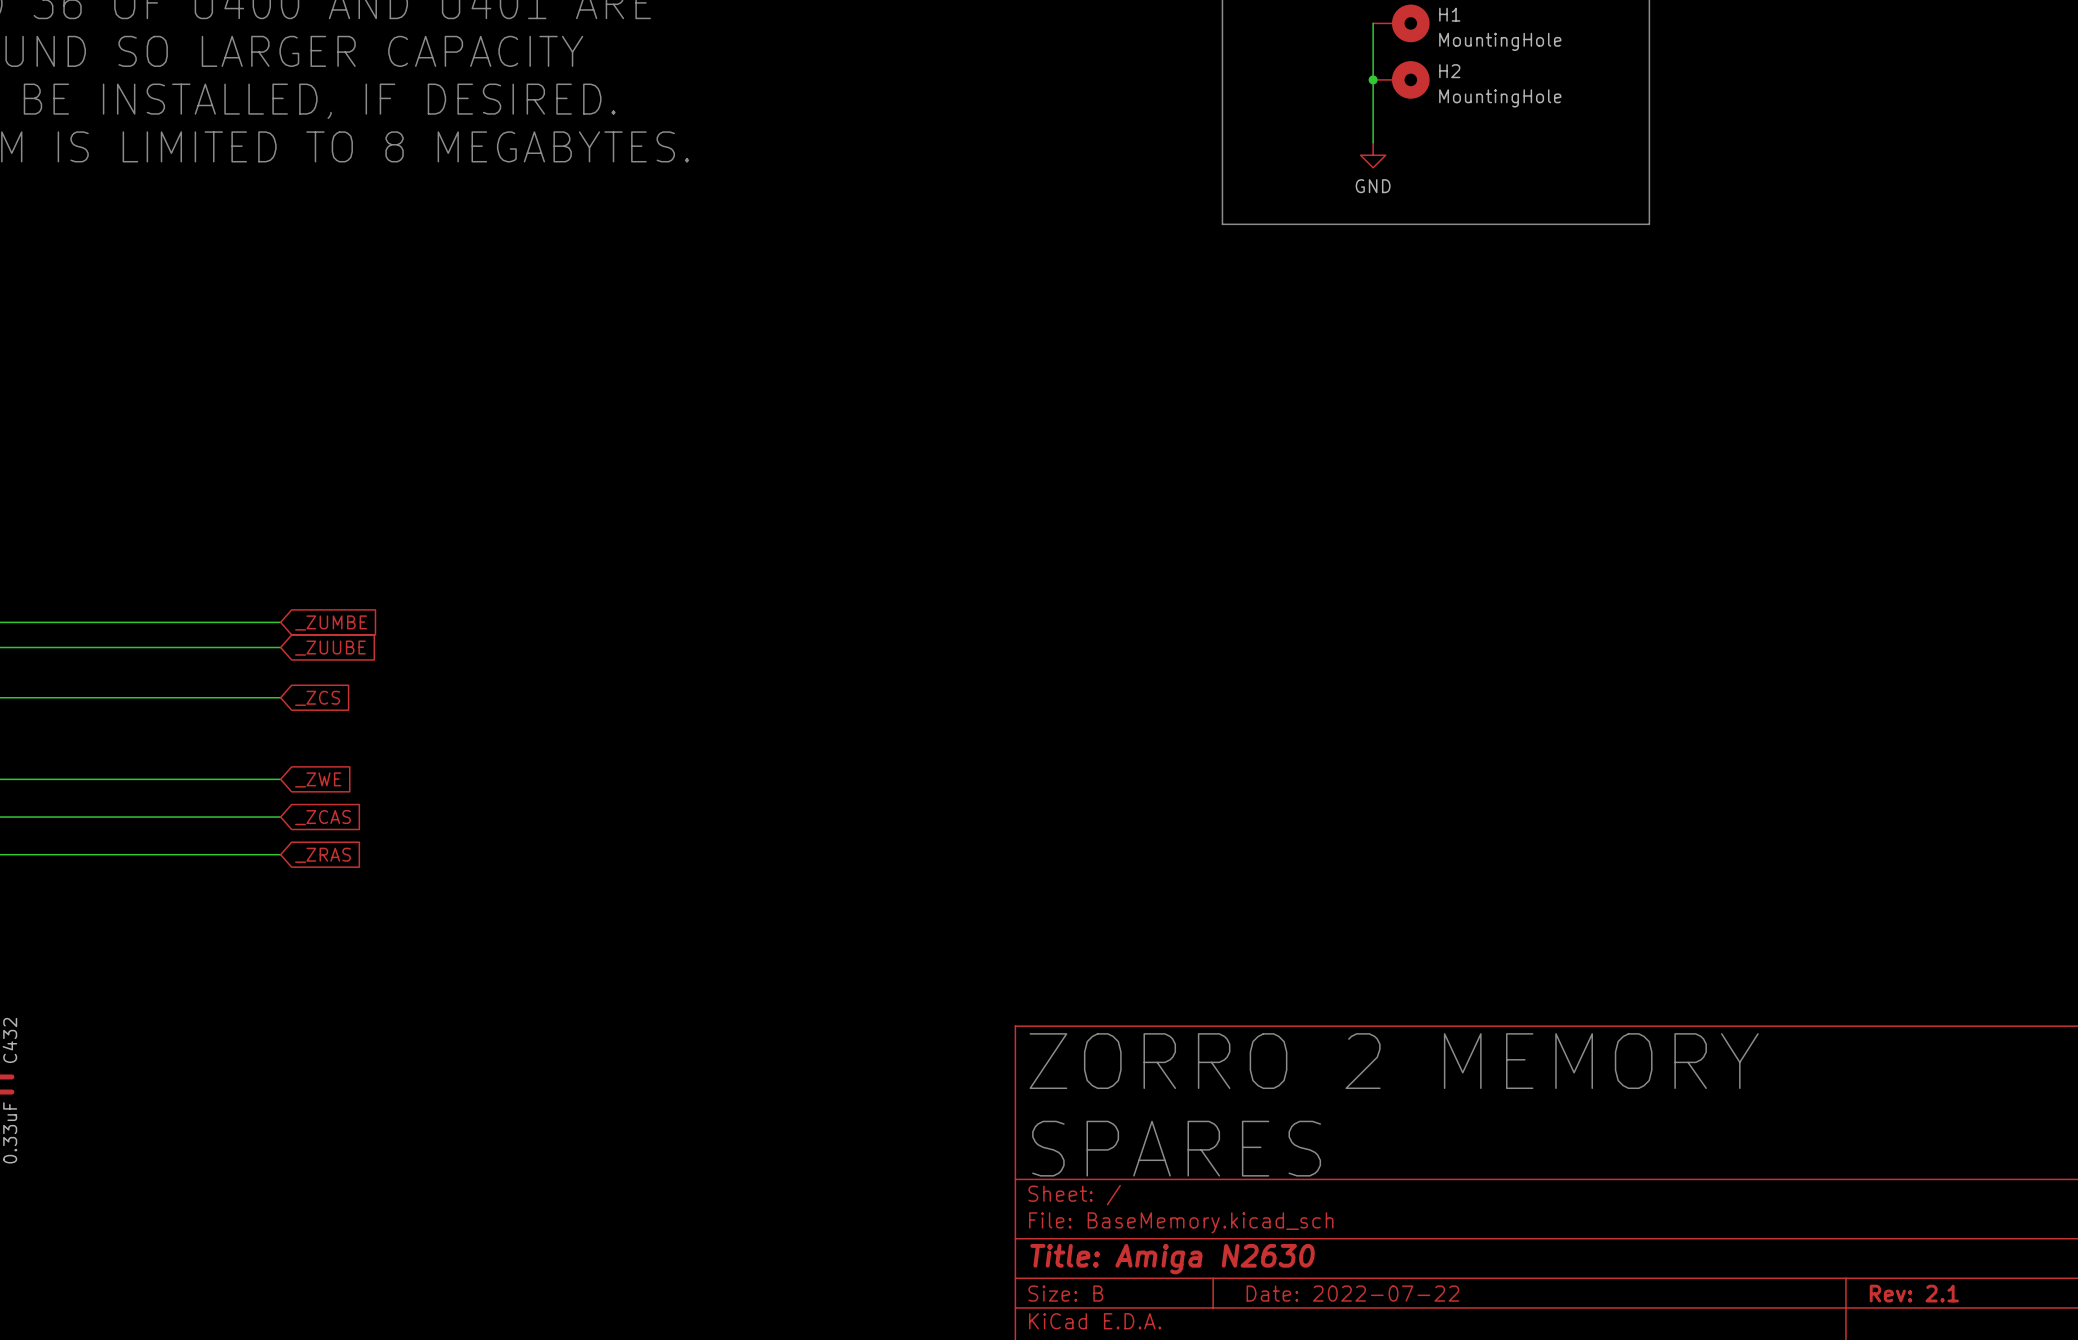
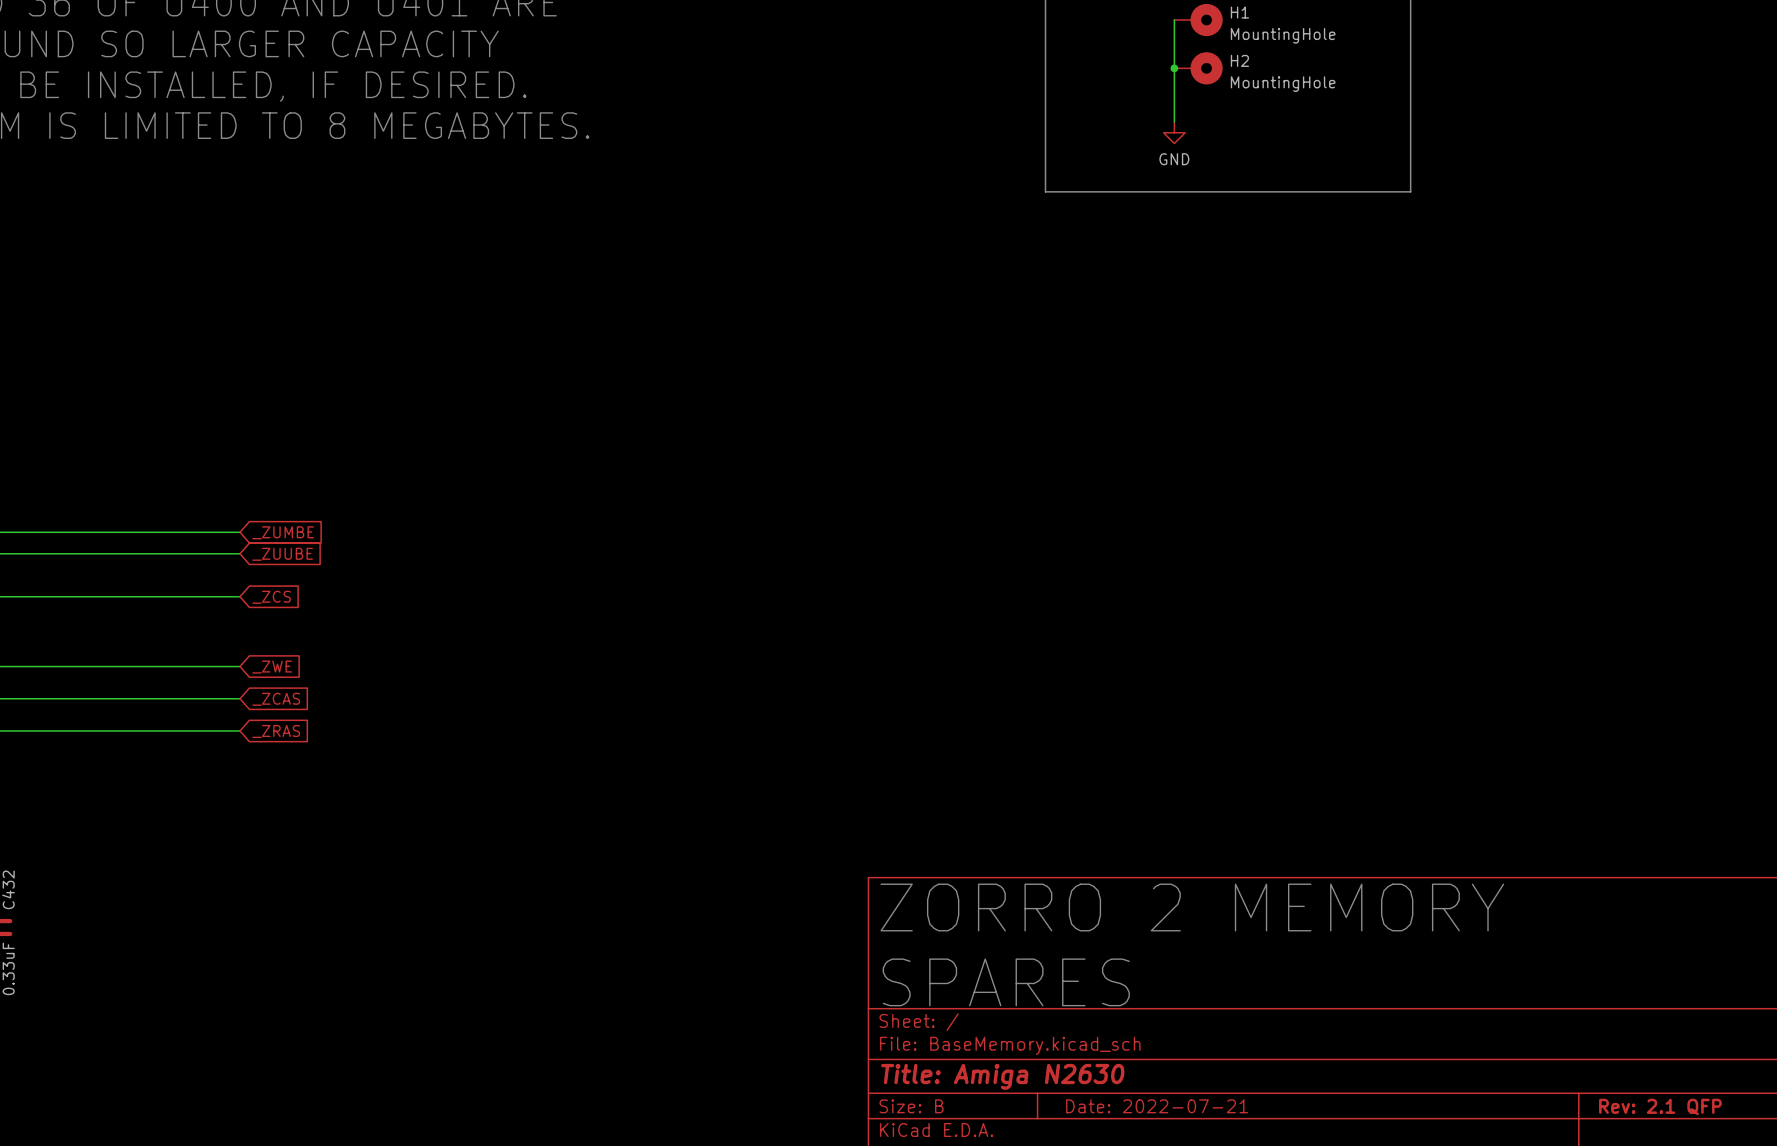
title block: Date: 2022-07-22 (1352, 1293) -> Date: 2022-07-21 (1157, 1106)
title block: Rev: 2.1 (1914, 1293) -> Rev: 2.1 QFP (1660, 1106)

